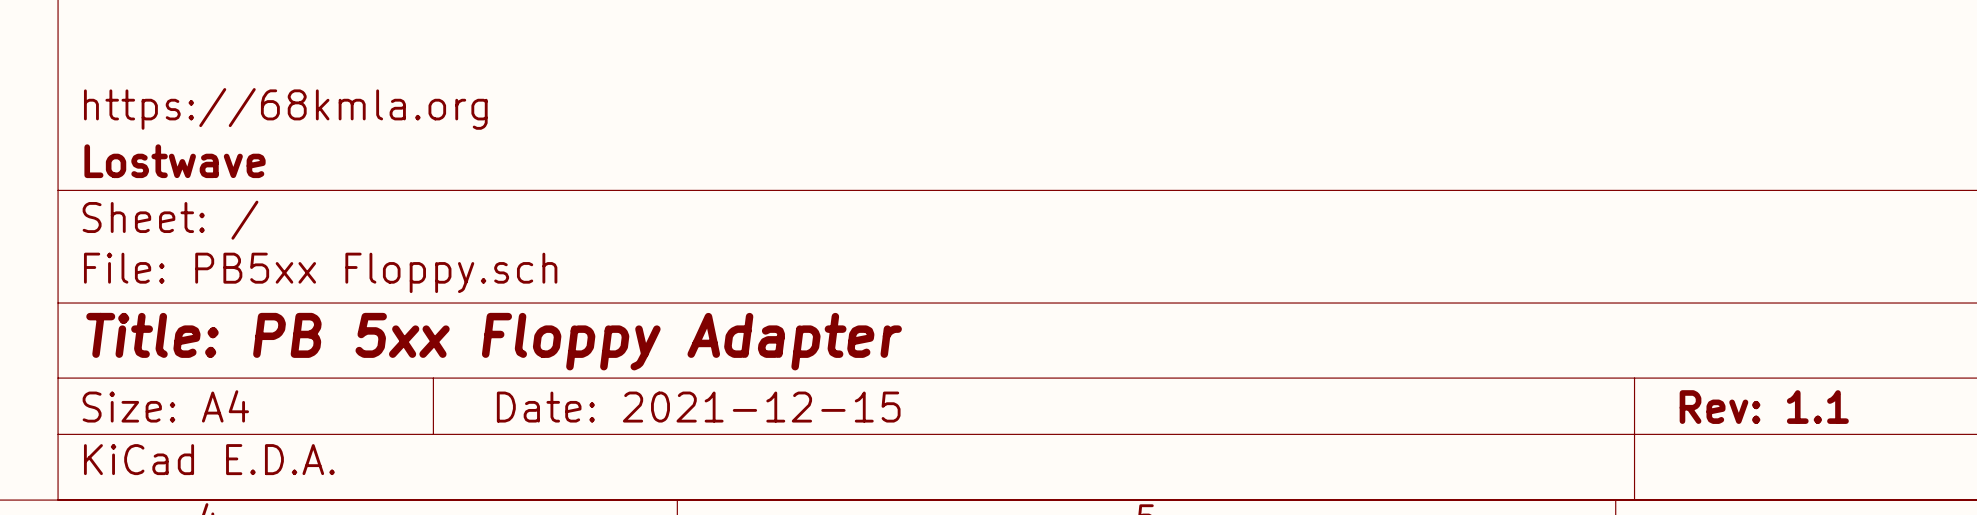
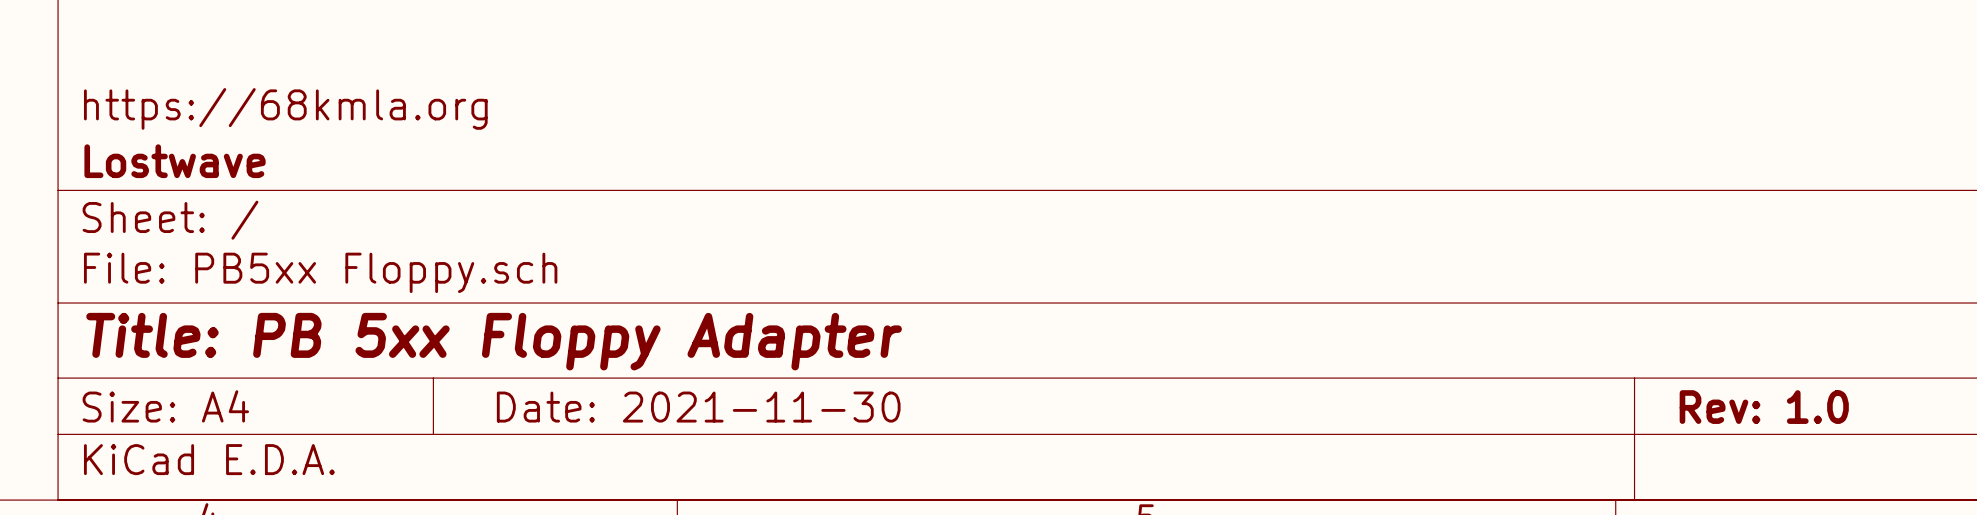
title block: Date: 2021-12-15 (698, 407) -> Date: 2021-11-30 (698, 407)
title block: Rev: 1.1 (1764, 407) -> Rev: 1.0 (1764, 407)

